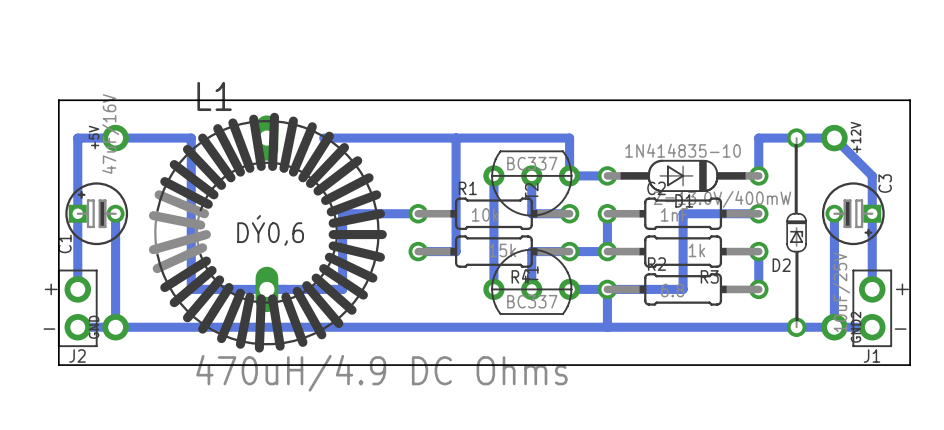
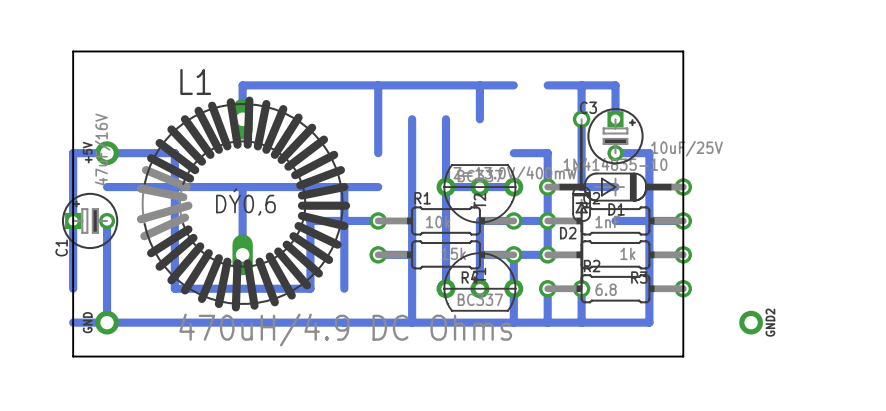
bottom track: none -> (378, 85) (378, 153)
bottom track: none -> (479, 85) (479, 119)
bottom track: none -> (513, 85) (242, 85) (242, 119)
bottom track: none -> (547, 85) (615, 85) (615, 119)
bottom track: none -> (581, 85) (581, 187) (615, 187)
bottom track: none -> (412, 119) (412, 153)
bottom track: none -> (446, 119) (446, 187) (513, 187)
bottom track: (323, 138) (569, 138) (569, 175) (607, 175) -> none
bottom track: none -> (513, 153) (547, 153) (547, 220) (513, 220)
+12V: (834, 138) -> none
bottom track: none -> (107, 187) (378, 187)
bottom track: none -> (242, 187) (242, 254)
bottom track: none -> (344, 187) (344, 288)
bottom track: (531, 175) (531, 213) -> (479, 254) (479, 220)
bottom track: (758, 175) (758, 138) (834, 138) (872, 175) (872, 289) -> none
bottom track: (683, 213) (683, 289) (569, 289) -> none
bottom track: (834, 213) (834, 327) -> none
C3 rotation: 0° (853, 213) -> 90° counterclockwise (615, 136)
C3 position: (853, 213) -> (615, 136)
L1 position: (267, 232) -> (243, 204)
D2 position: (796, 232) -> (581, 204)
bottom track: none -> (412, 254) (412, 322)
bottom track: none -> (513, 254) (513, 322)
bottom track: (758, 251) (758, 289) -> (581, 288) (581, 322)
J2: (77, 308) -> none
J1: (872, 308) -> none
bottom track: (720, 327) (872, 327) -> (649, 322) (649, 153) (615, 153)
board edge: (77, 365) (58, 365) (58, 100) (910, 100) (910, 365) (758, 365) -> (73, 356) (73, 51) (683, 51) (683, 356)

